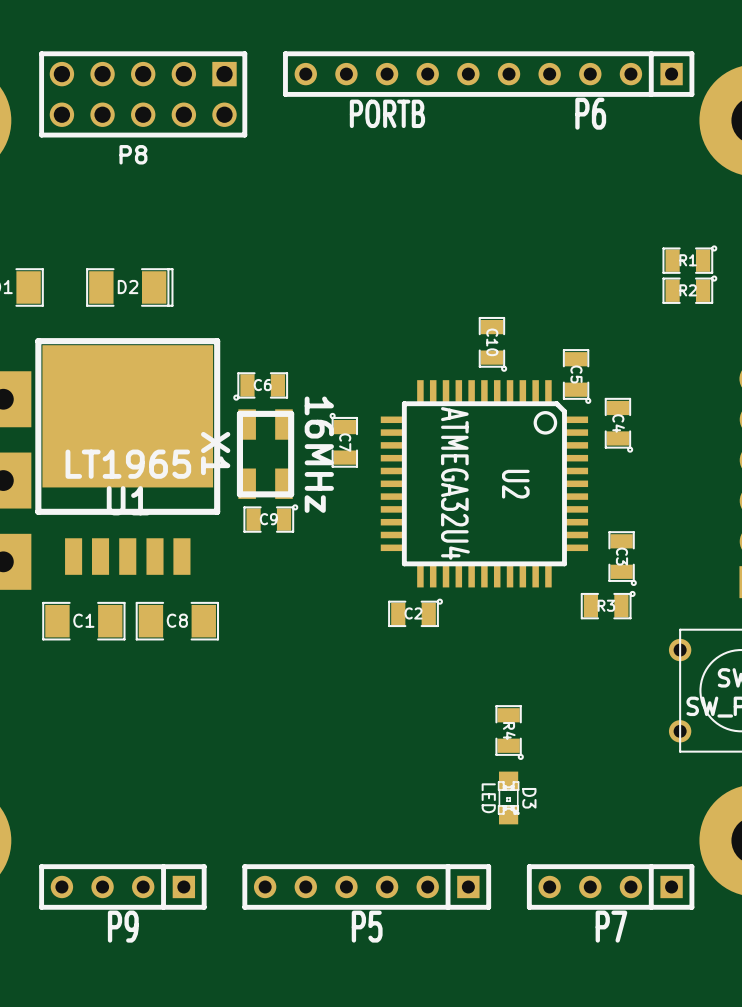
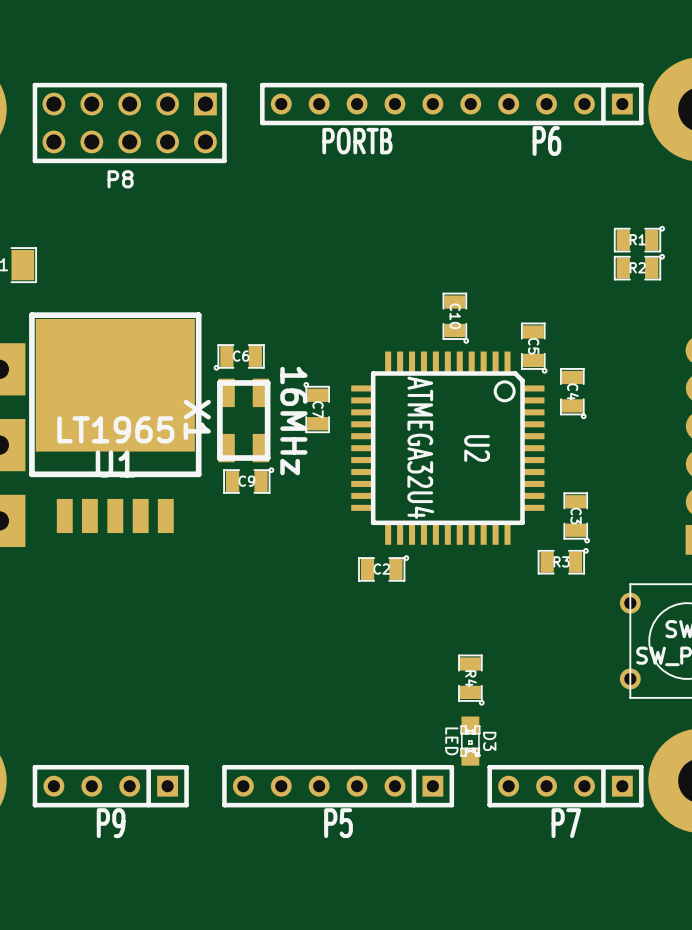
P6 position: (488, 74) -> (451, 104)
P8 position: (143, 94) -> (129, 123)
D2: (129, 287) -> none
C1: (83, 621) -> none
C8: (177, 621) -> none
P9 position: (122, 886) -> (110, 786)
P5 position: (366, 886) -> (338, 786)
P7 position: (610, 886) -> (565, 786)

